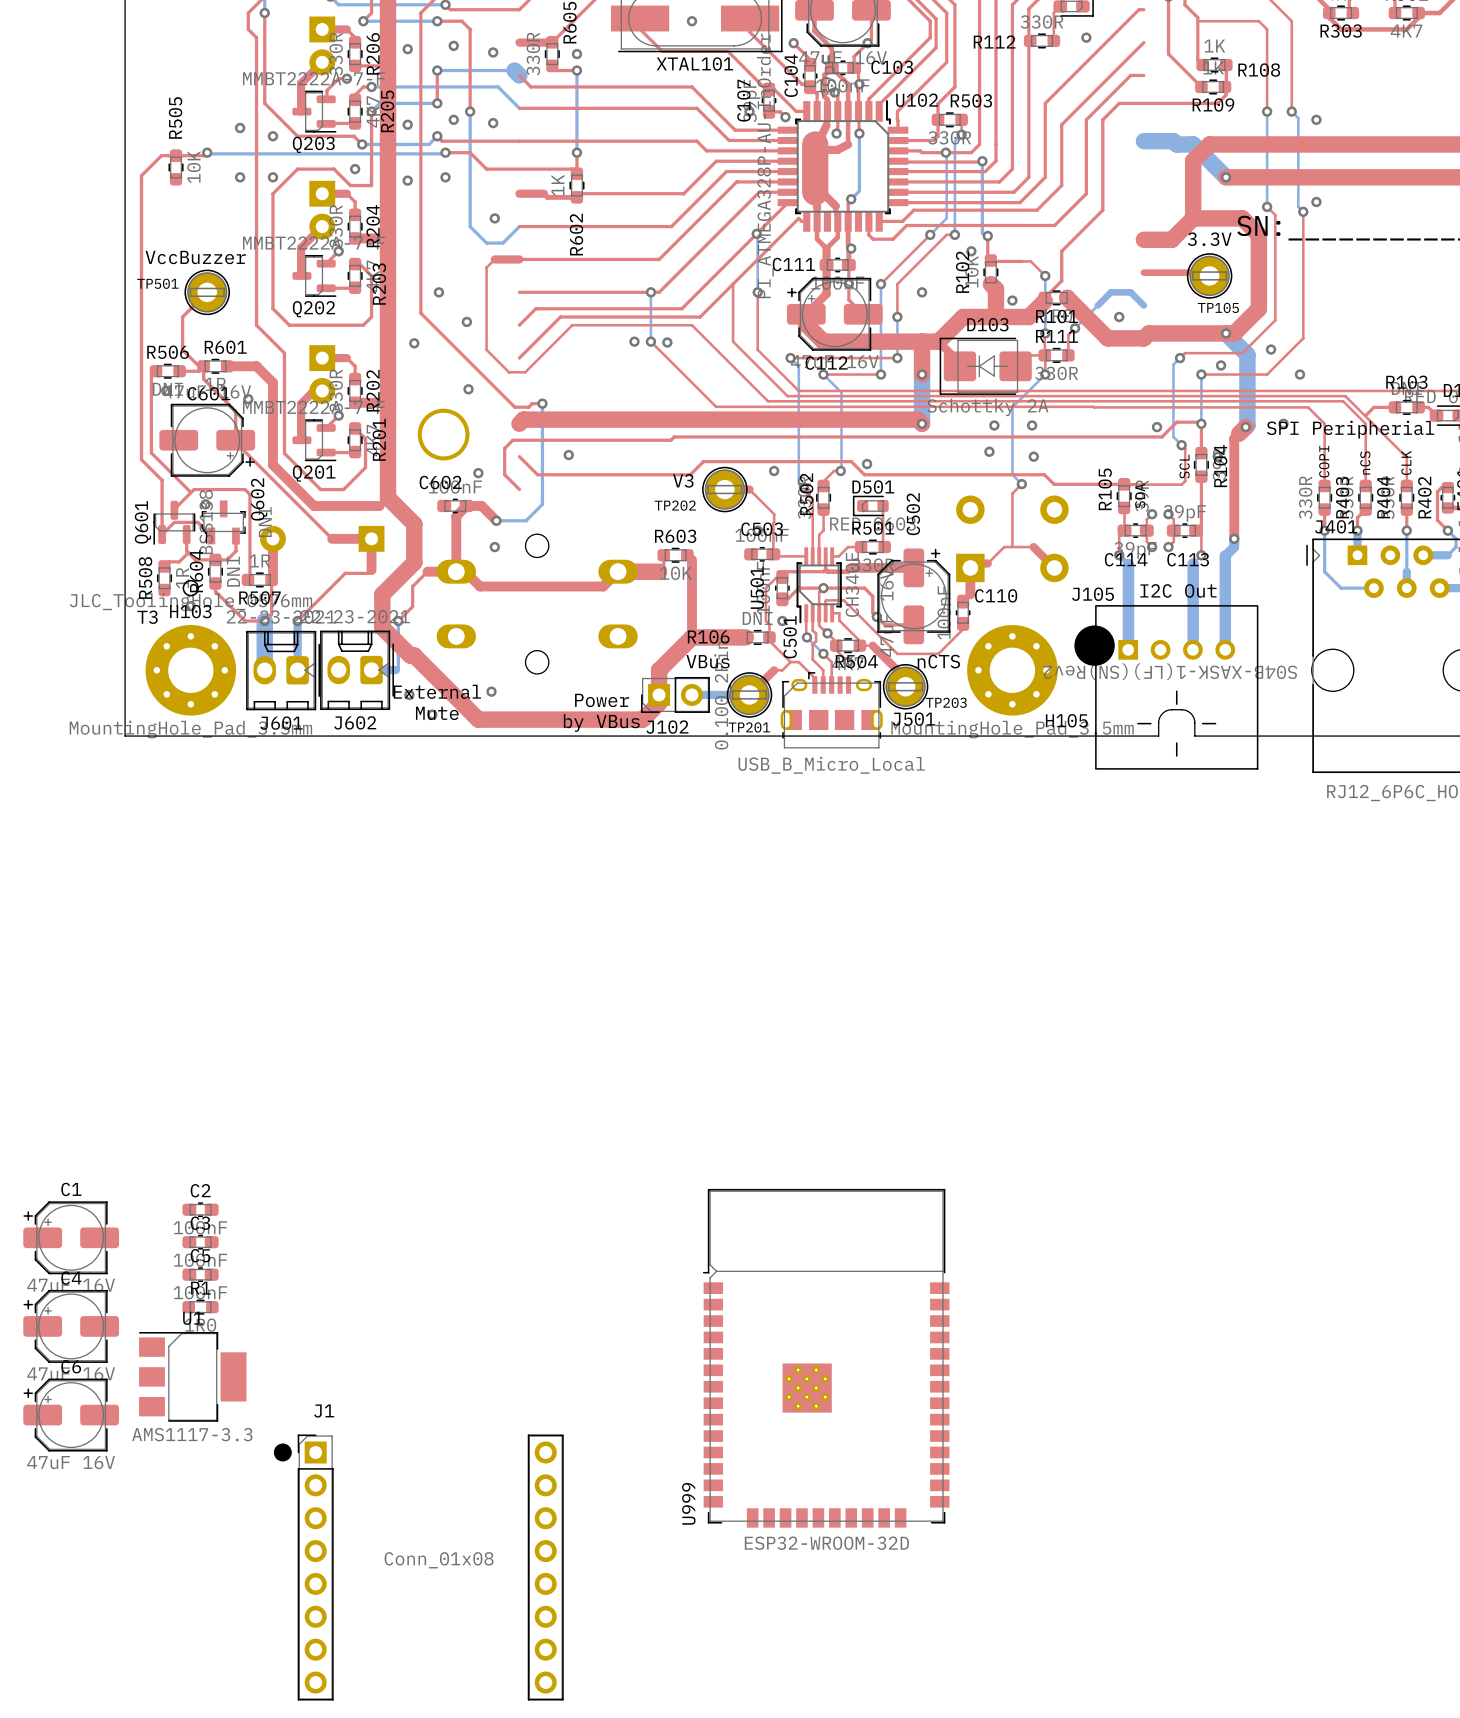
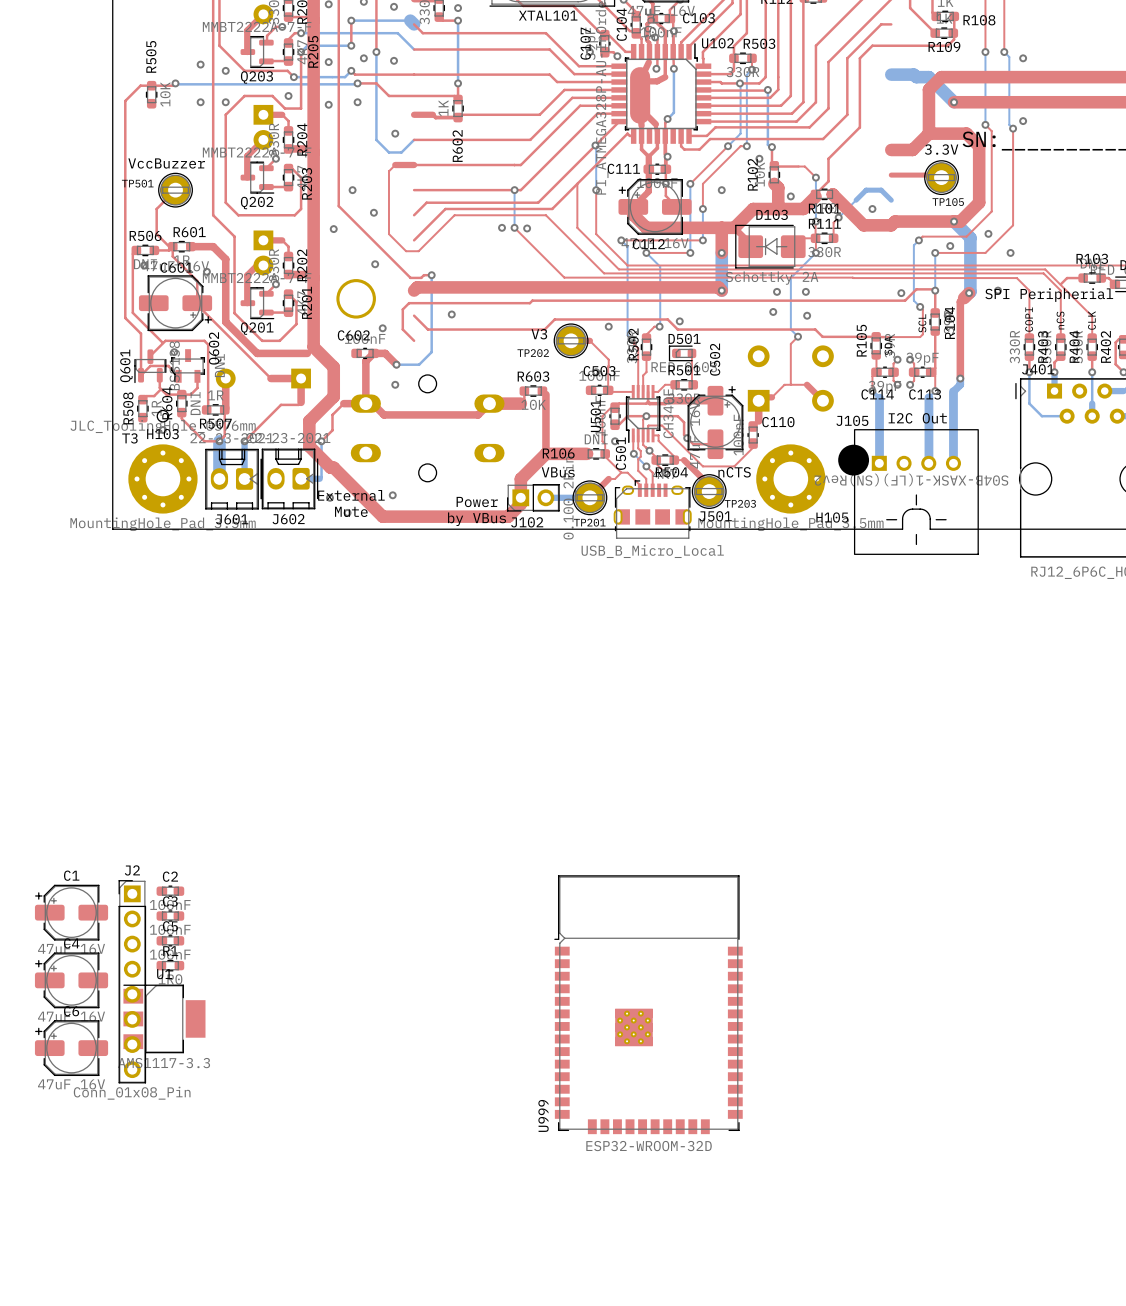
J2: none -> Conn_01x08_Pin (132, 981)
J1: Conn_01x08 (418, 1567) -> none

